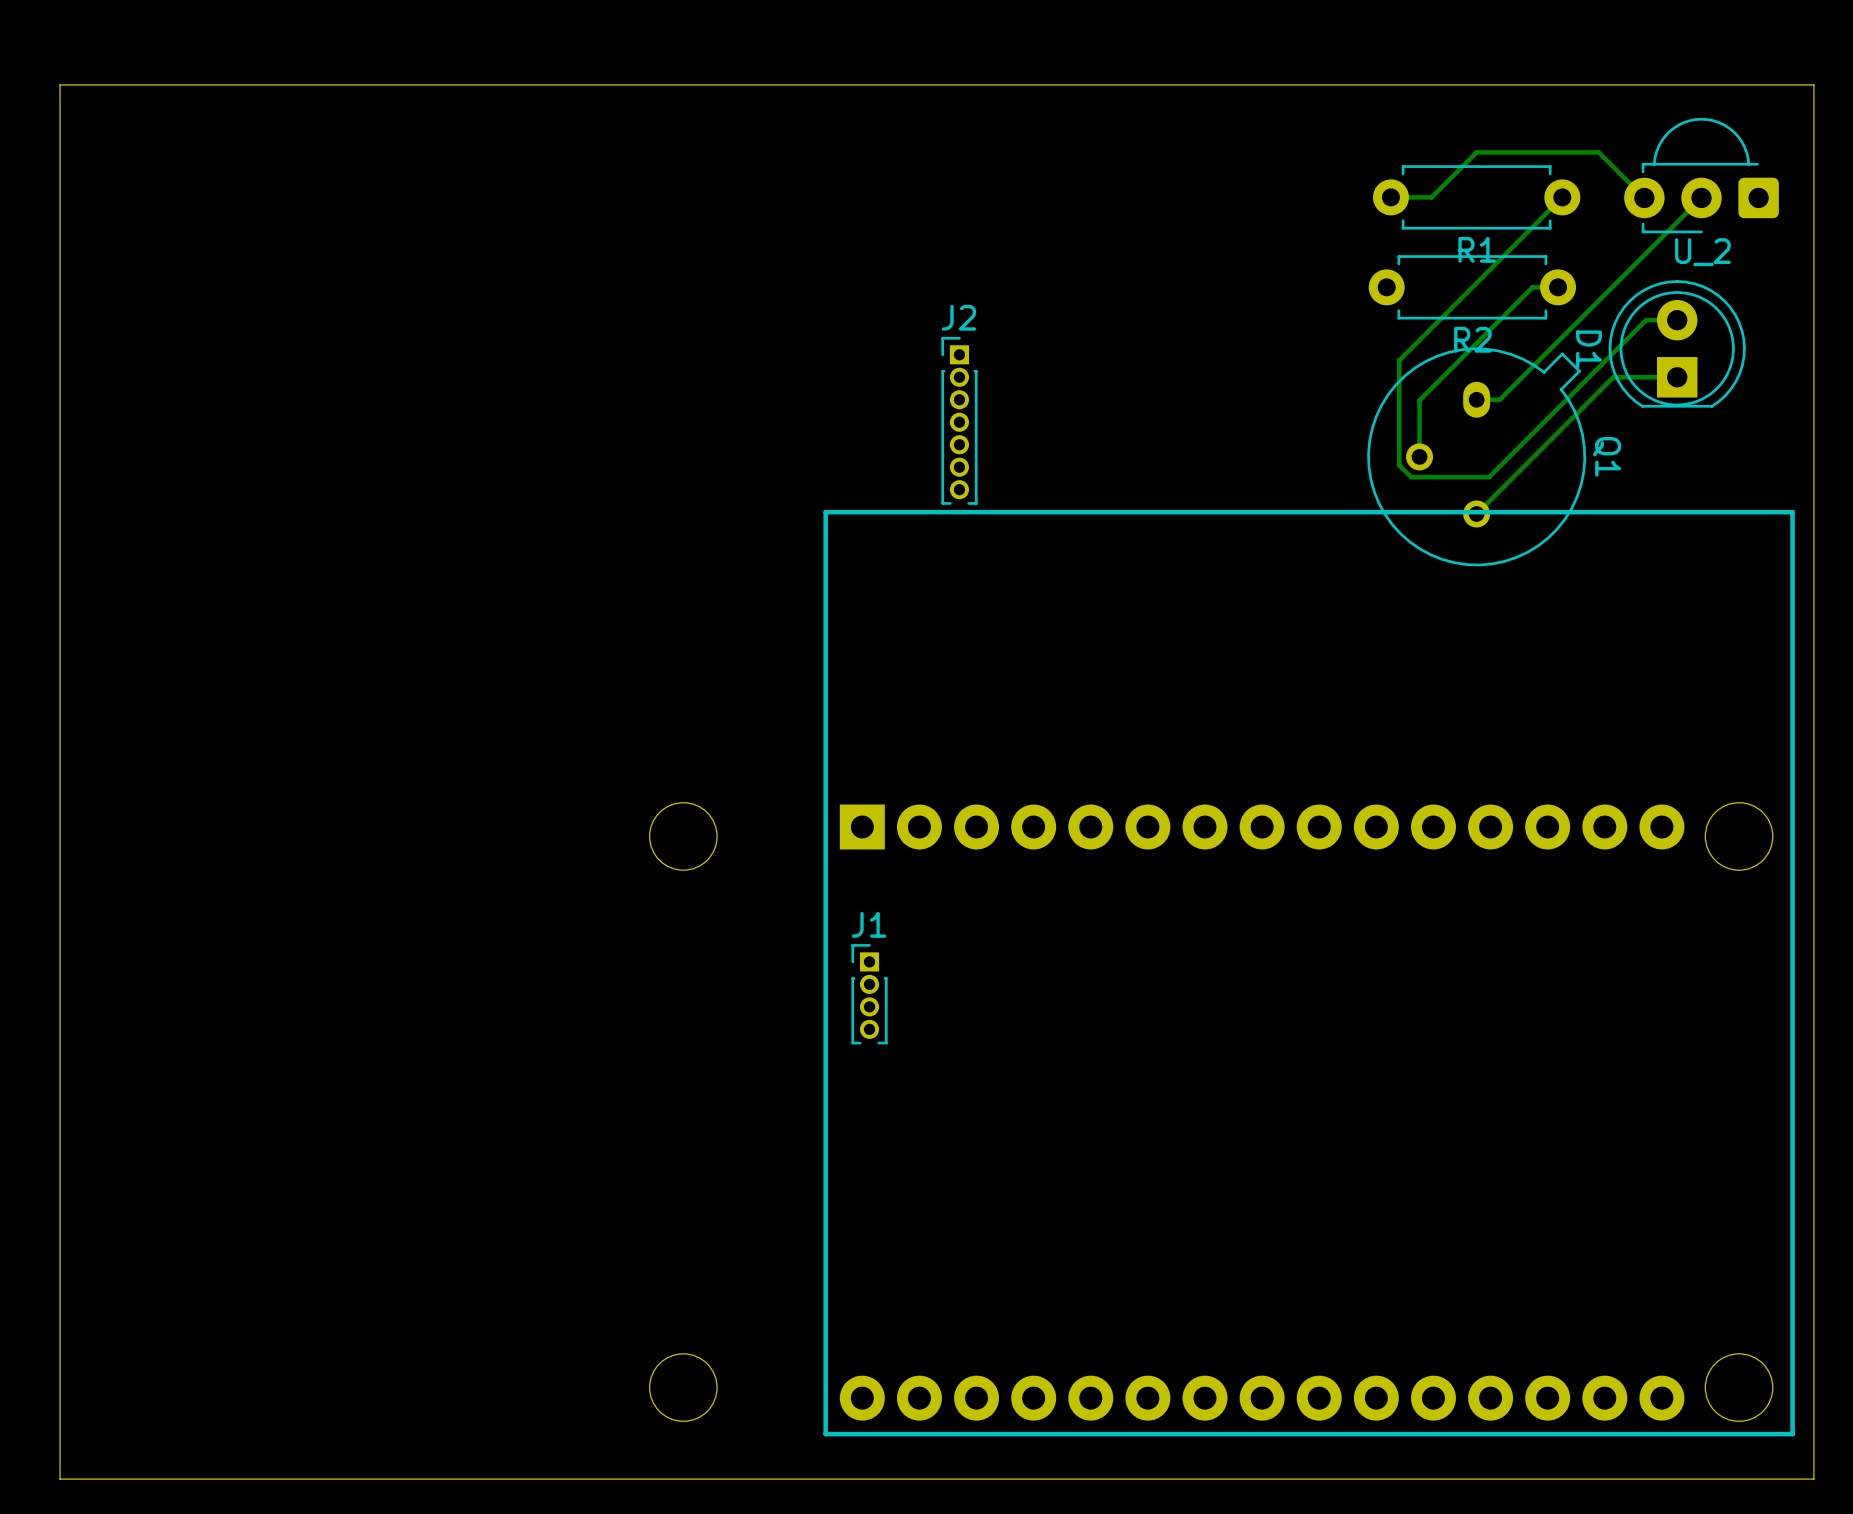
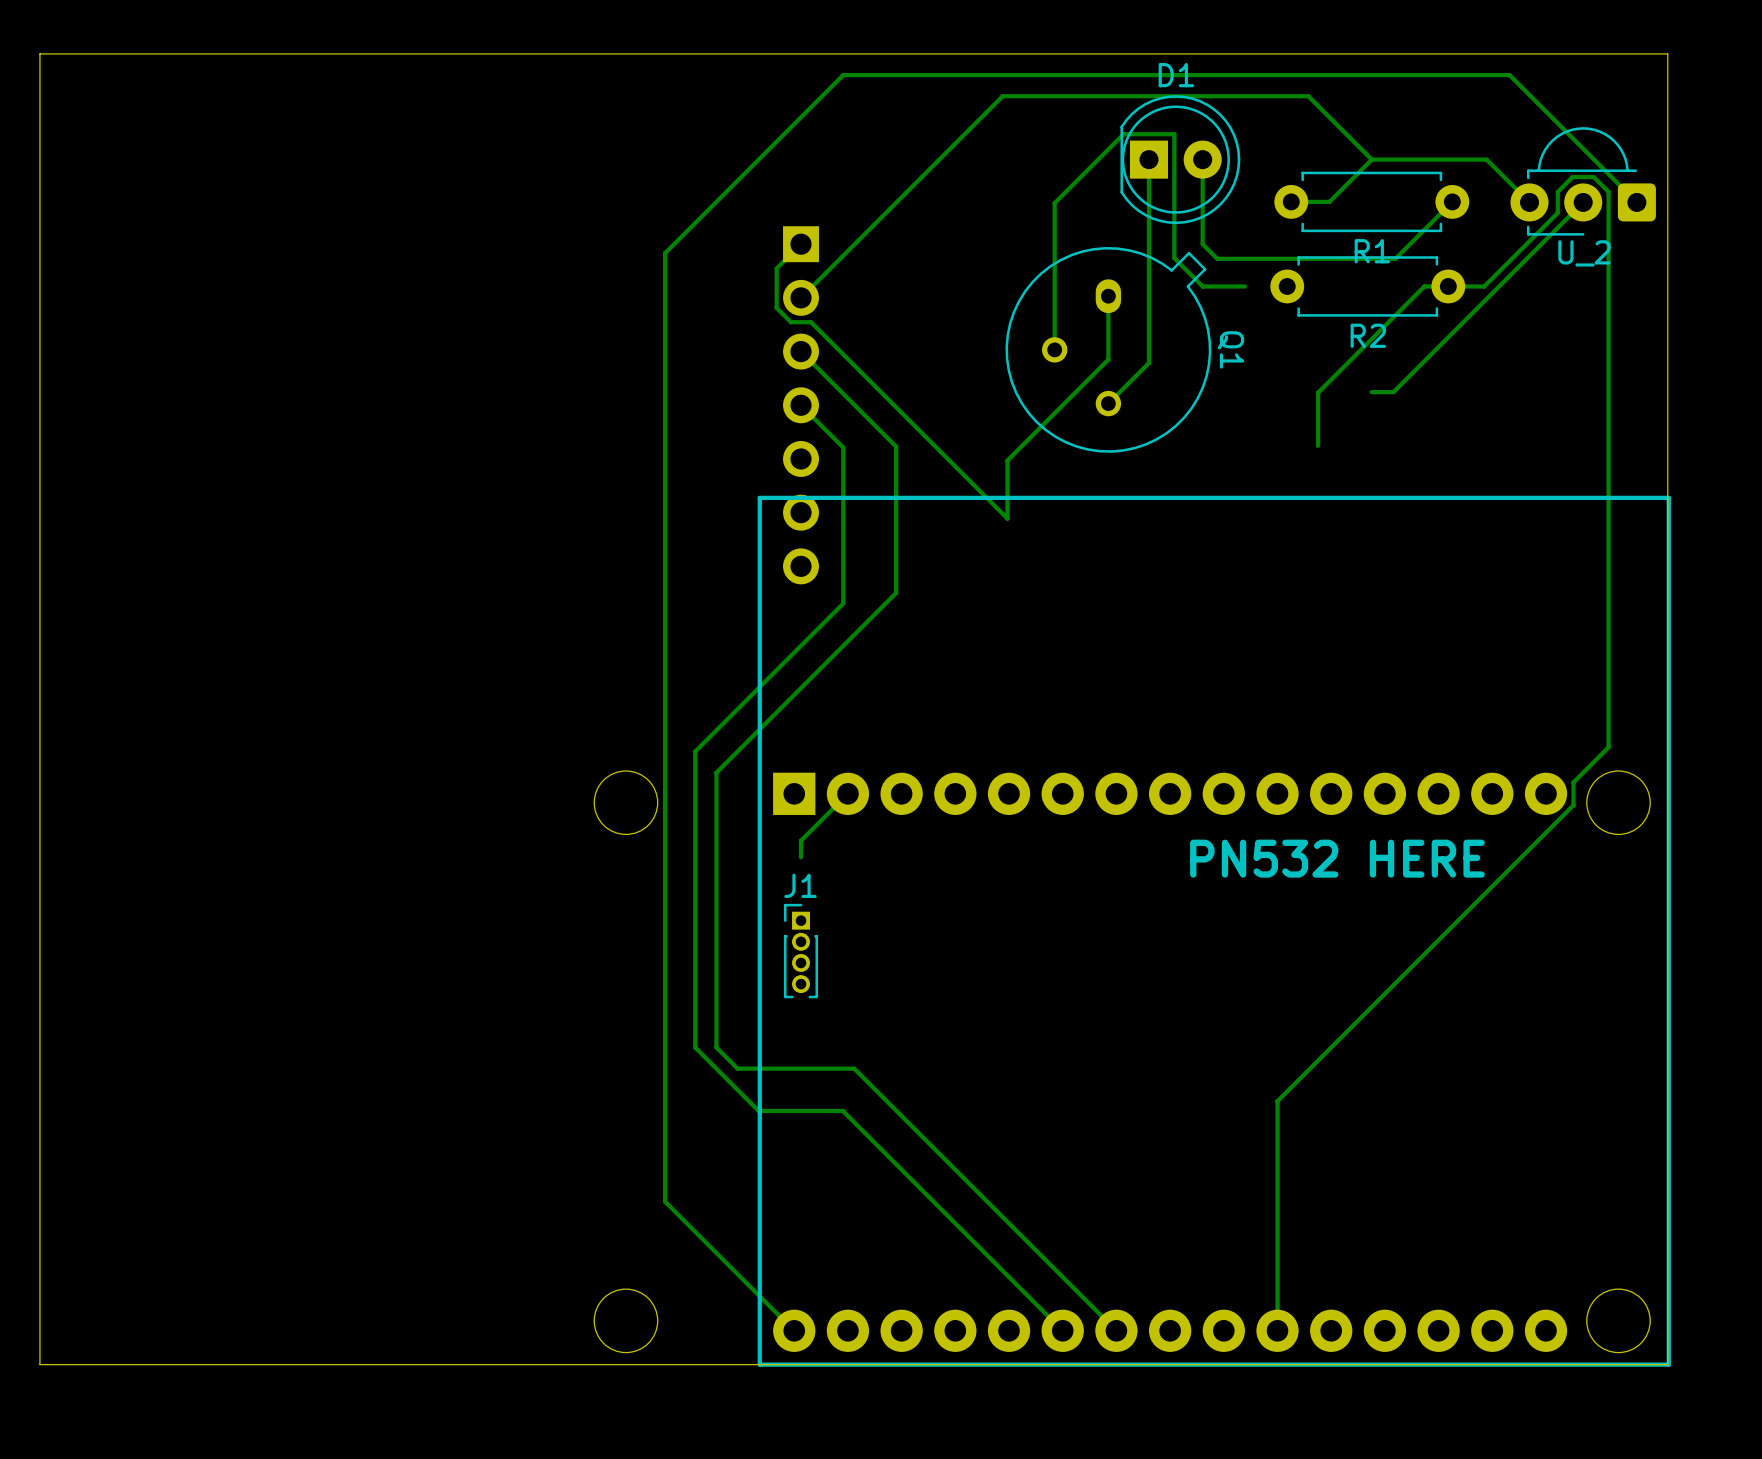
board edge: (60, 84) (1813, 84) (1813, 1479) (60, 1479) (60, 1434) -> (39, 96) (39, 53) (1667, 53) (1667, 1364) (39, 1364)
track: none -> (1148, 159) (1148, 362) (1108, 403)
track: none -> (1371, 159) (1308, 96) (1002, 96) (801, 297)
track: none -> (1636, 202) (1509, 75) (843, 75) (665, 253) (665, 1201) (794, 1330)
track: none -> (801, 244) (776, 268) (776, 307) (790, 322) (811, 322) (1007, 518) (1007, 460) (1108, 359) (1108, 296)
track: (1501, 257) (1399, 360) (1399, 465) (1411, 477) (1489, 477) (1646, 320) (1677, 320) -> (1395, 258) (1217, 258) (1202, 244) (1202, 159)
track: none -> (1244, 286) (1202, 286) (1174, 258) (1174, 134) (1123, 134) (1054, 203) (1054, 349)
track: none -> (1448, 286) (1484, 286) (1557, 212) (1557, 191) (1572, 177) (1593, 177) (1608, 191) (1608, 747) (1573, 782) (1573, 805) (1277, 1101) (1277, 1330)
D1 rotation: 0° (1677, 343) -> 90° clockwise (1180, 159)
D1 position: (1677, 343) -> (1180, 159)
track: none -> (801, 351) (896, 446) (896, 593) (716, 772) (716, 1047) (737, 1068) (854, 1068) (1116, 1330)
track: (1677, 377) (1613, 377) (1476, 513) -> none
track: none -> (801, 405) (843, 447) (843, 603) (695, 751) (695, 1047) (758, 1110) (843, 1110)
part: none -> (801, 405)
J2: (959, 420) -> none
Q1 position: (1476, 456) -> (1108, 349)
track: none -> (847, 793) (801, 840) (801, 857)
text: none -> PN532 HERE (1337, 858)
track: none -> (843, 1111) (1062, 1330)

